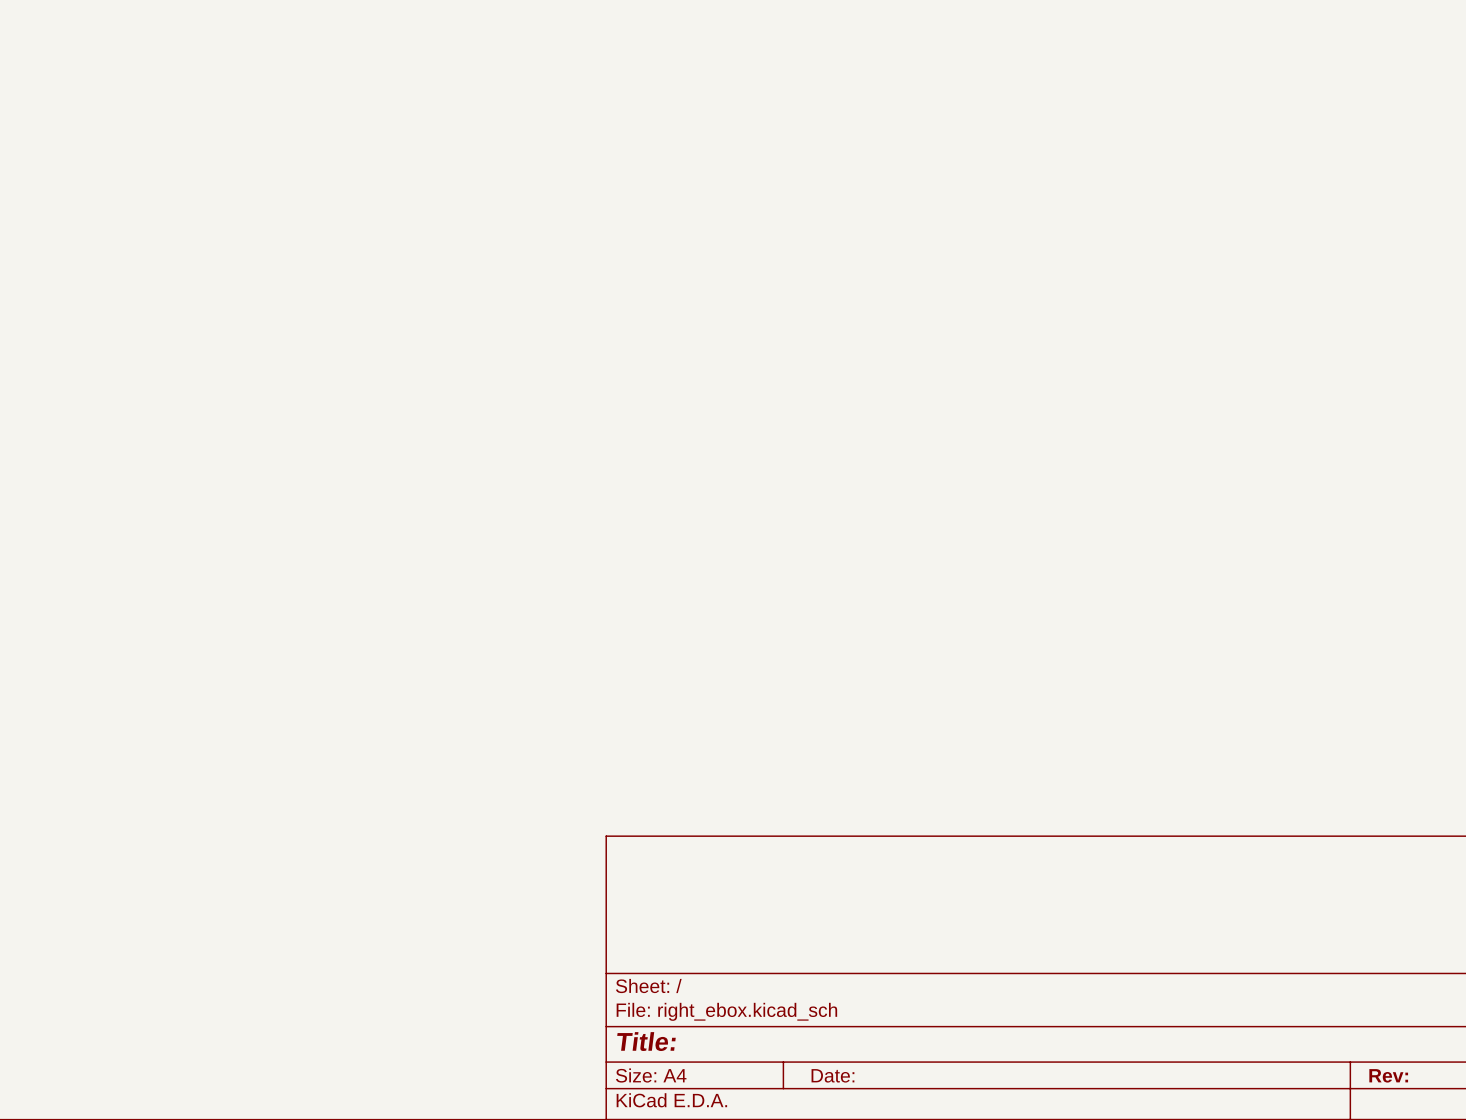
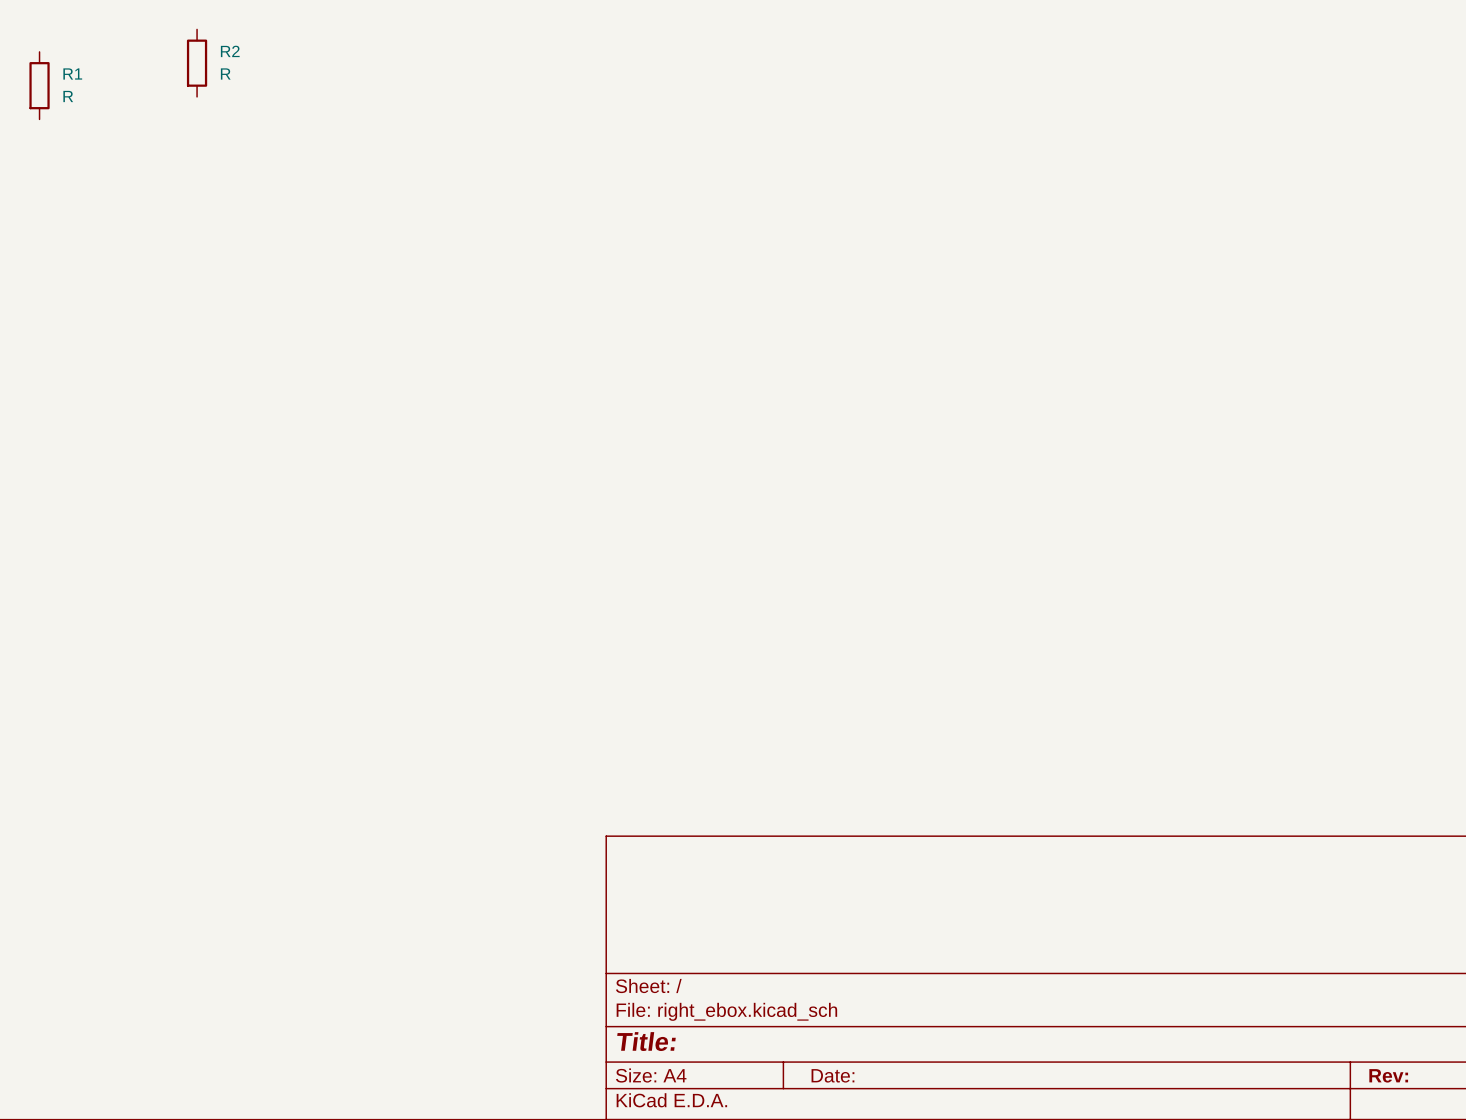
R2: none -> R (197, 63)
R1: none -> R (39, 85)

